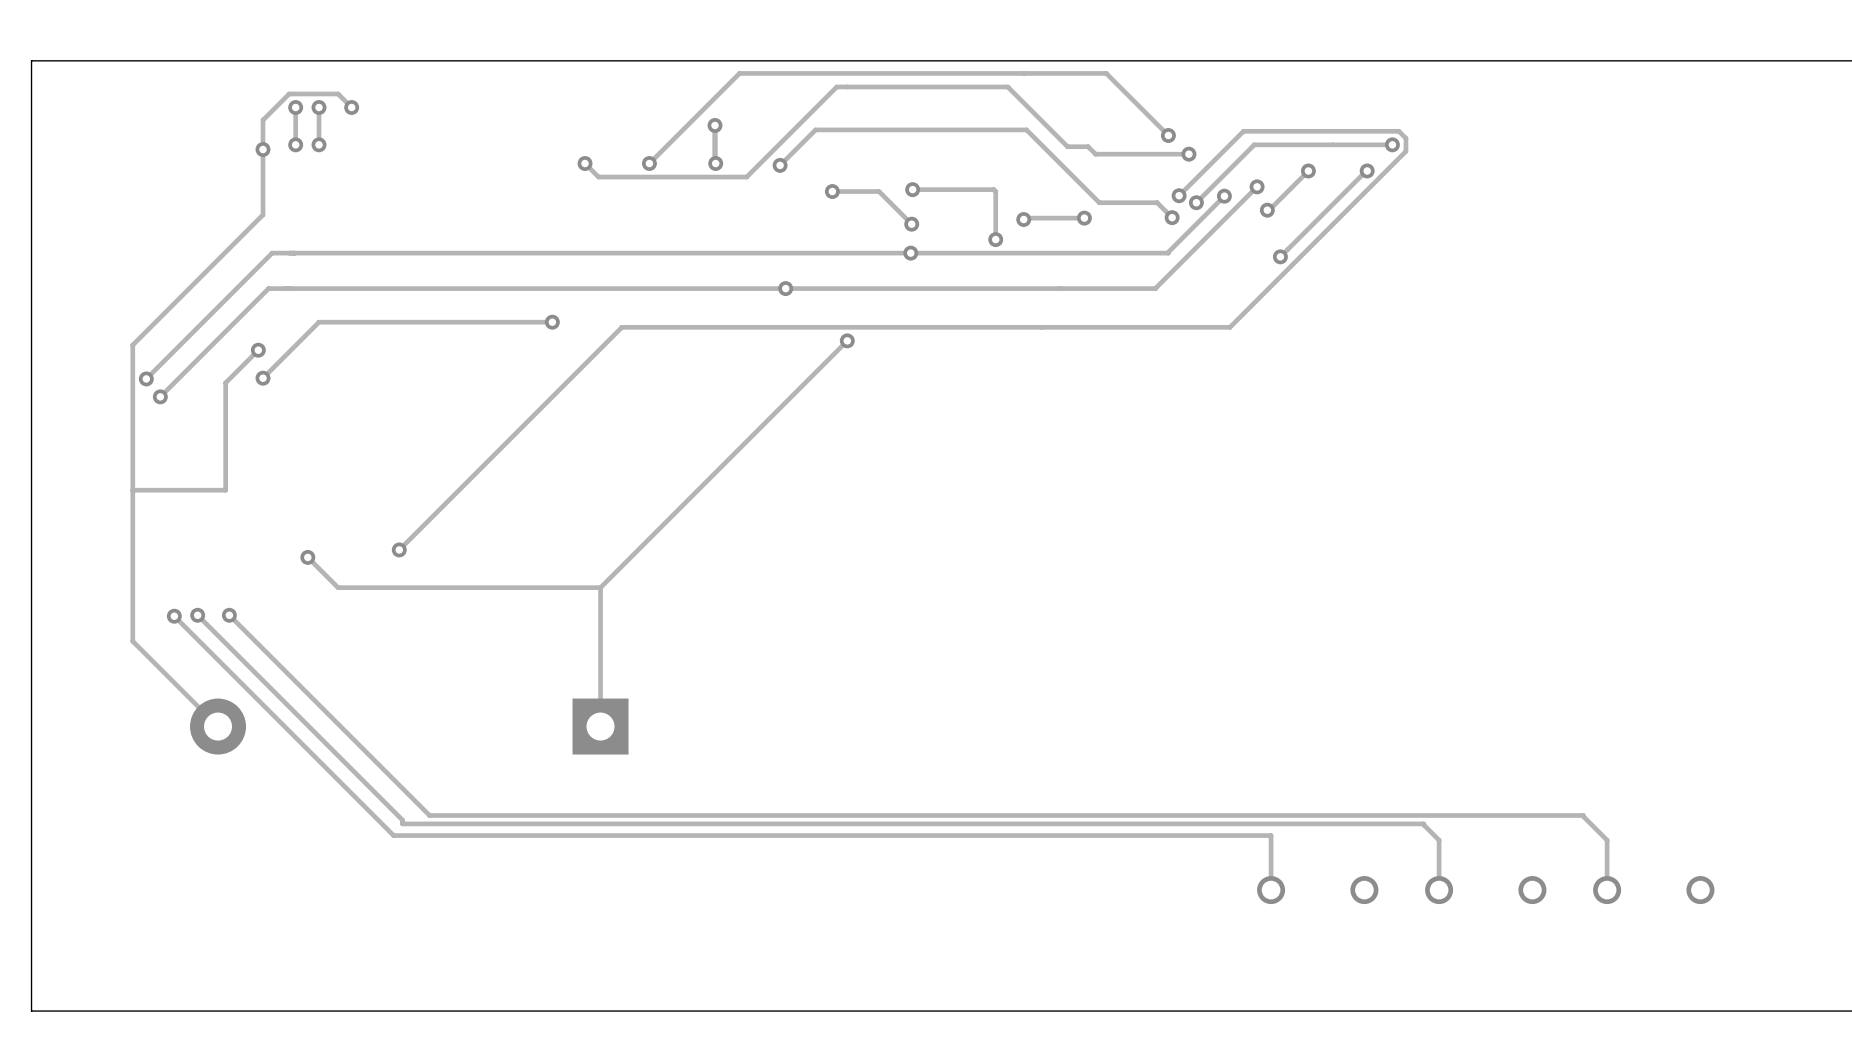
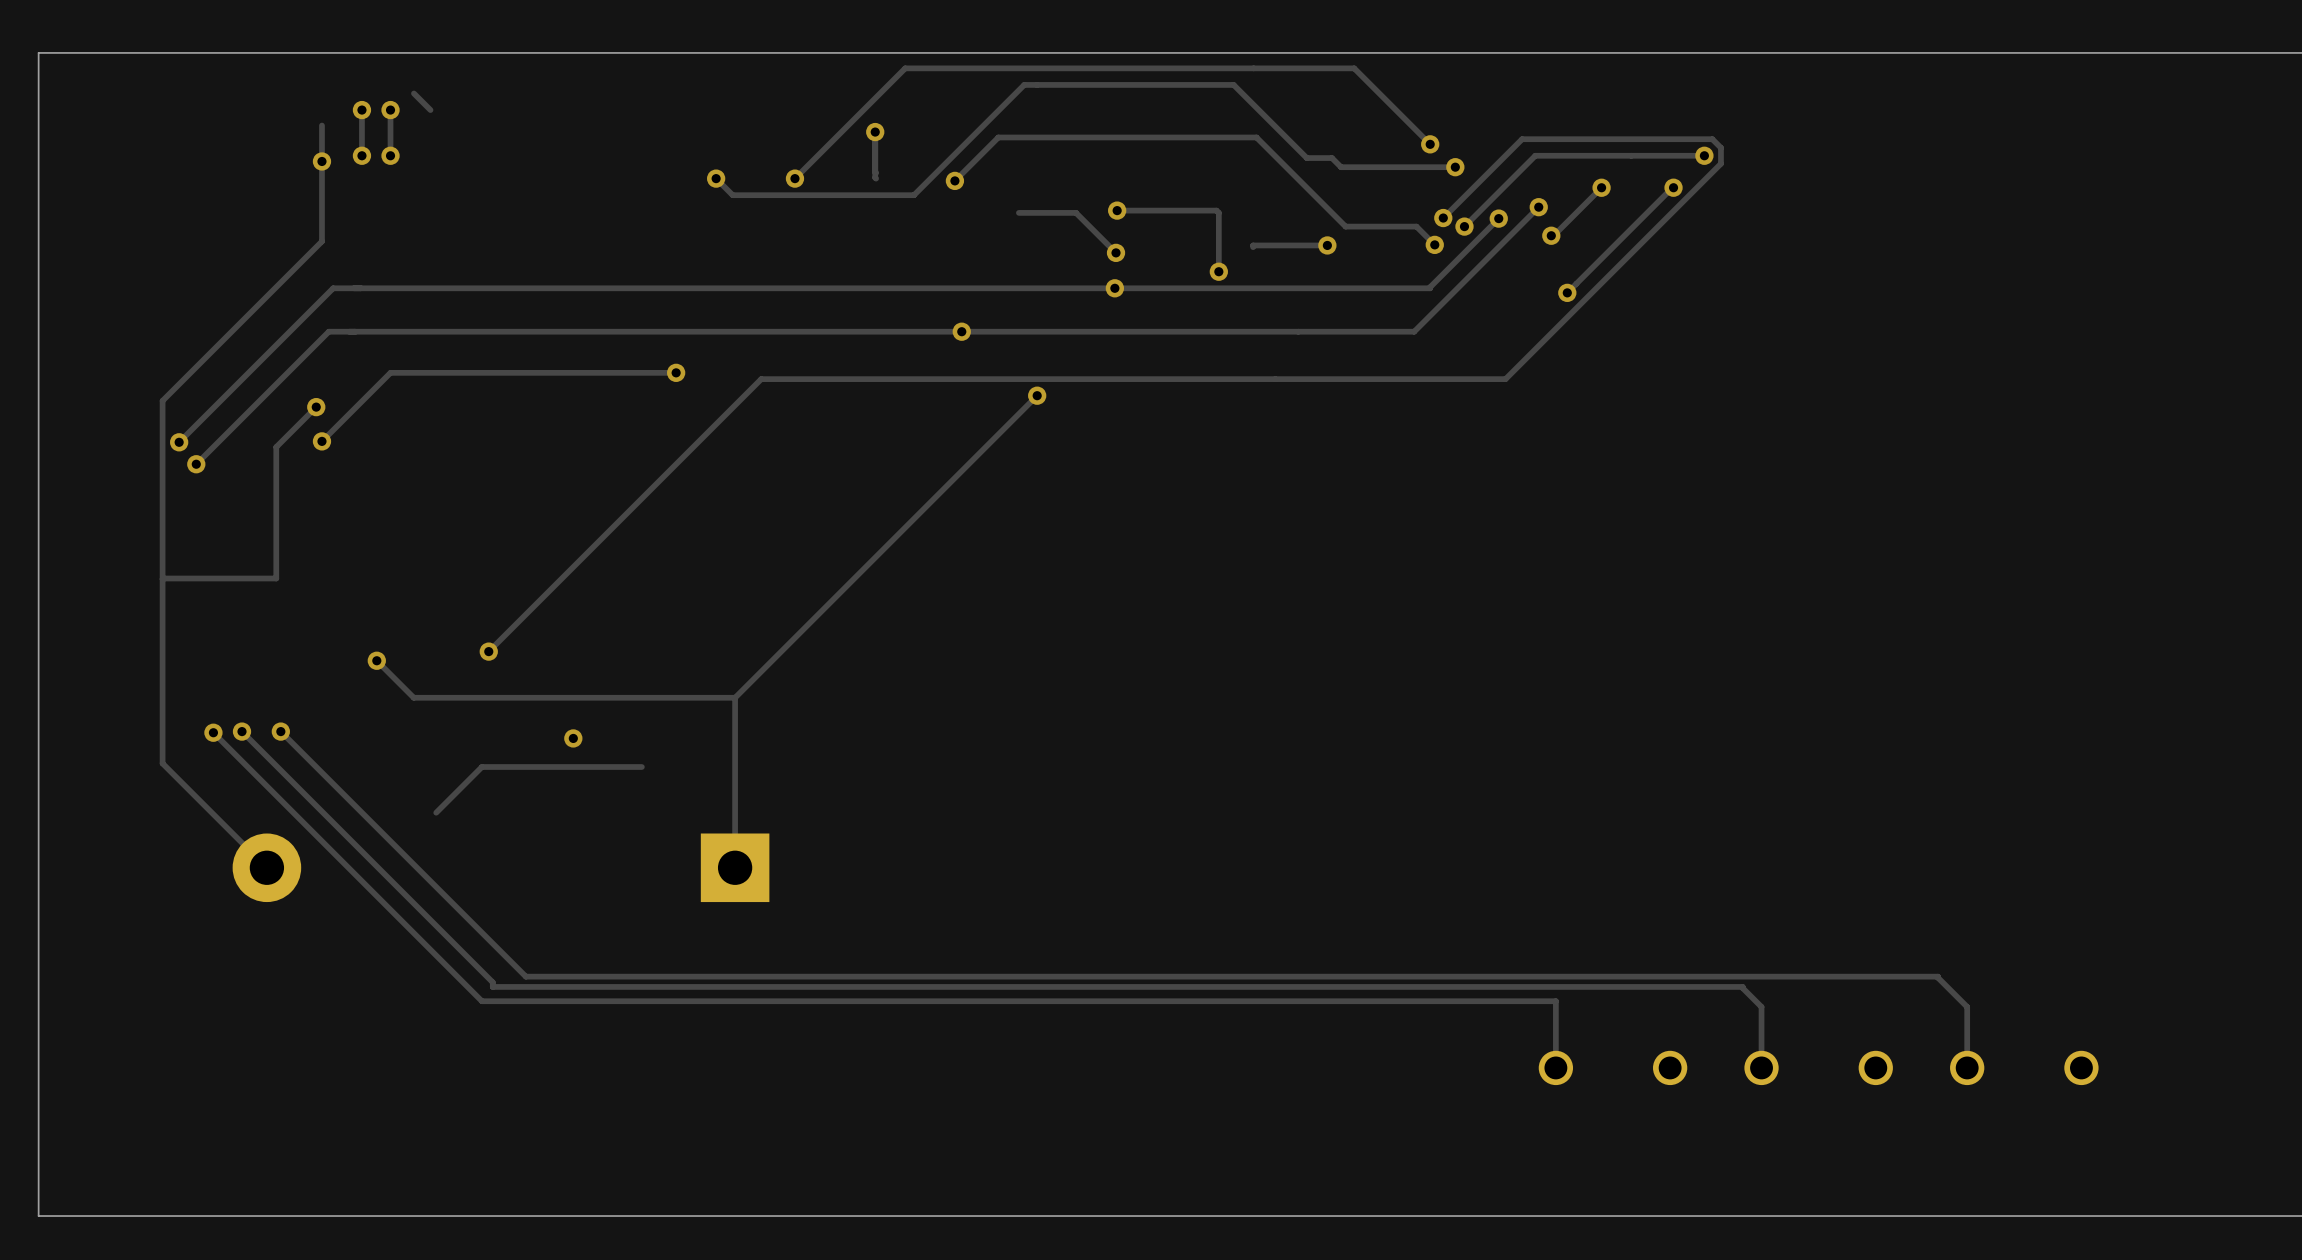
track: (338, 93) (289, 93) (263, 120) -> none
via: (351, 107) -> none
via: (715, 163) -> none
via: (832, 191) -> none
via: (1023, 219) -> none
via: none -> (573, 738)
track: none -> (641, 767) (481, 767) (436, 812)

